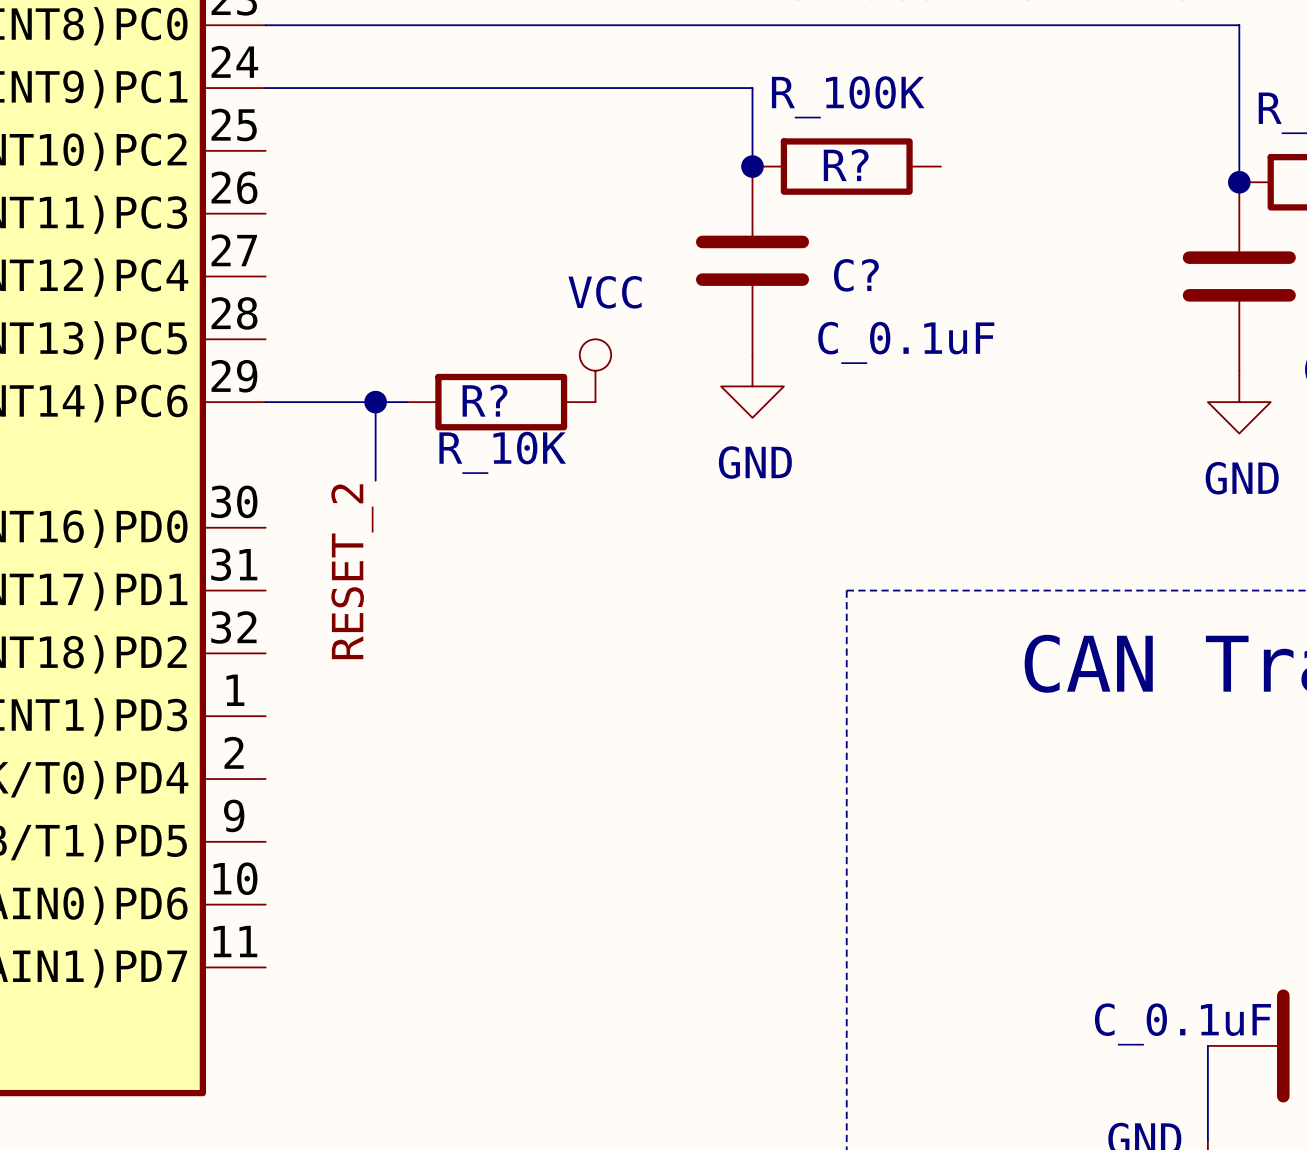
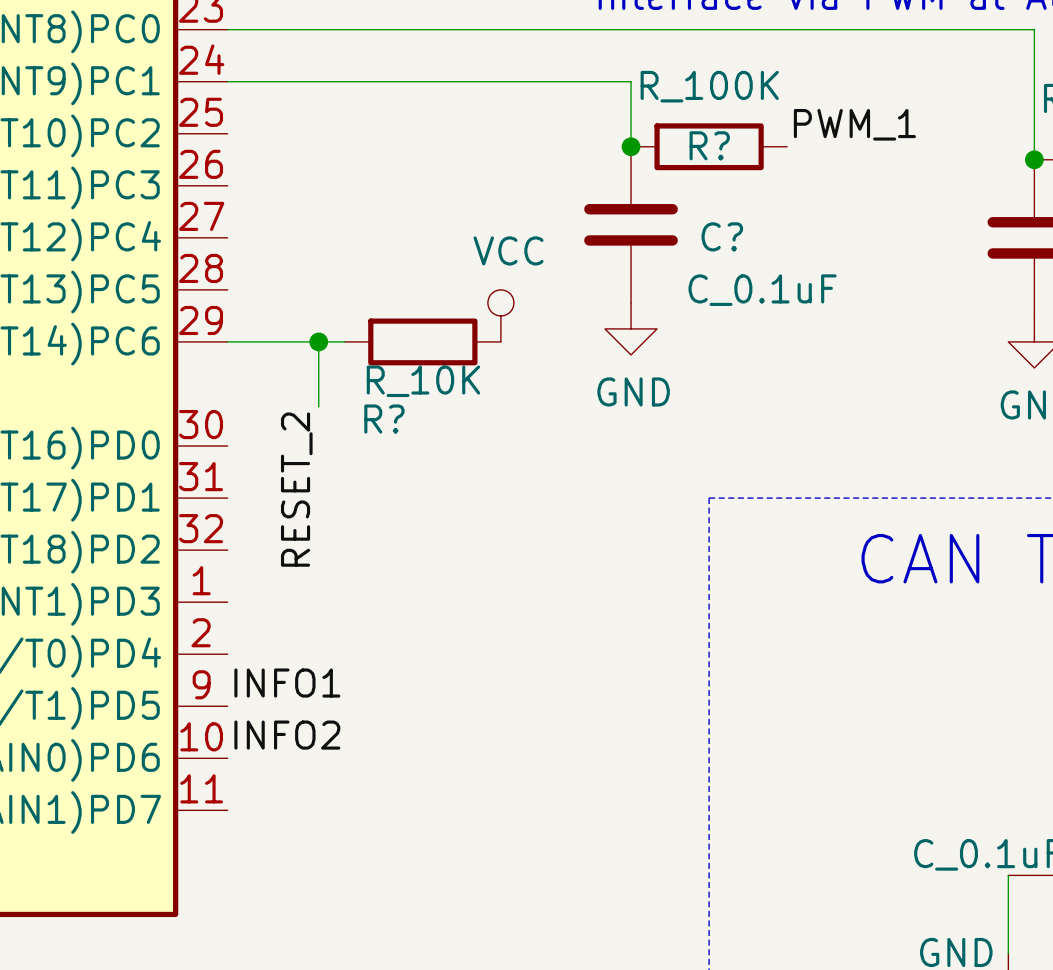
label: none -> PWM_1 (854, 124)
R? name position: R? (485, 400) -> R? (384, 419)
label: none -> INFO1 (287, 683)
label: none -> INFO2 (287, 735)

